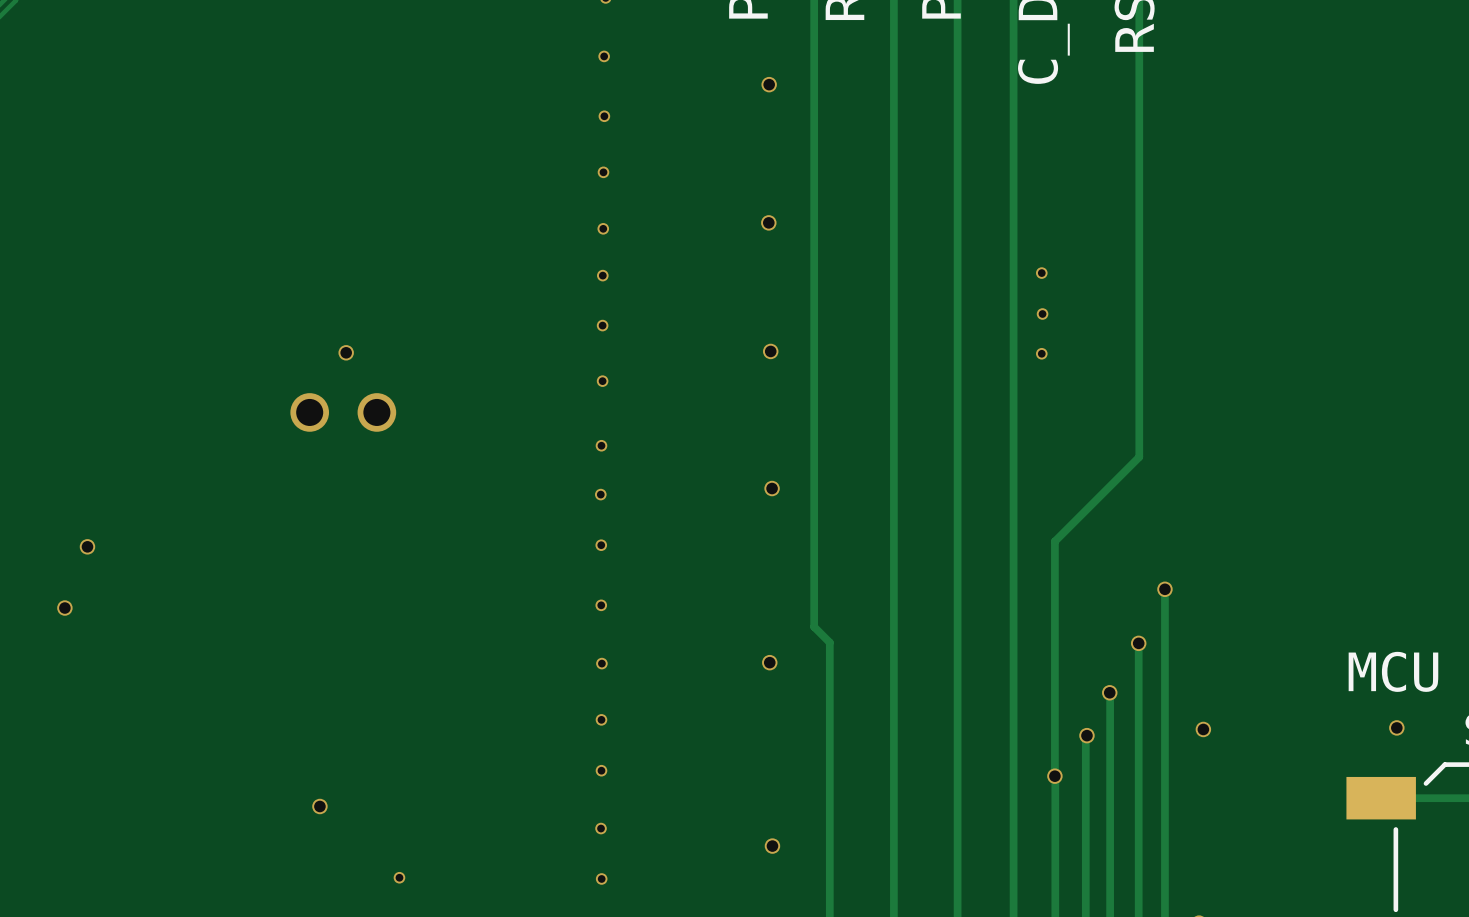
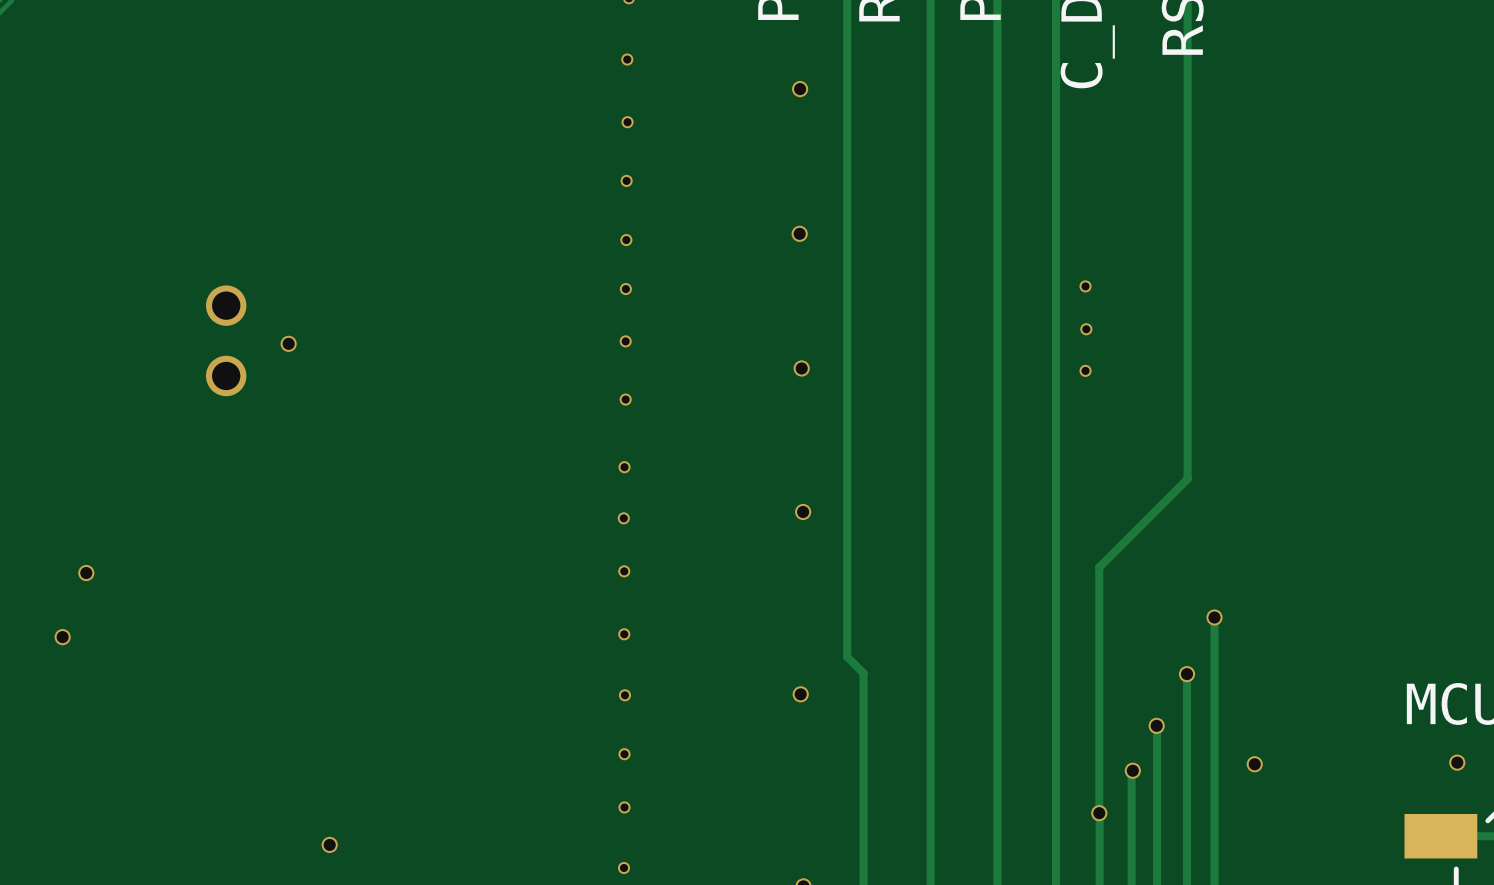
via: none -> (226, 305)
via position: (346, 352) -> (288, 343)
via: none -> (226, 375)
via: (309, 412) -> none
via: (376, 412) -> none

